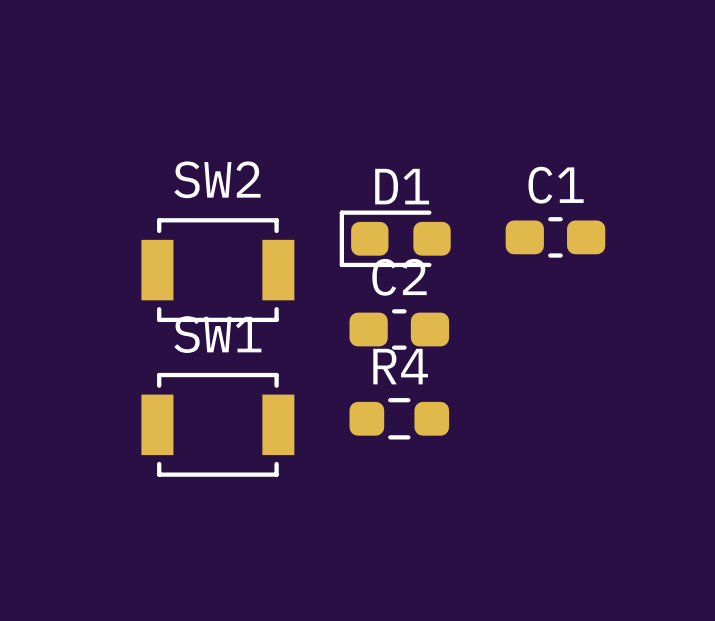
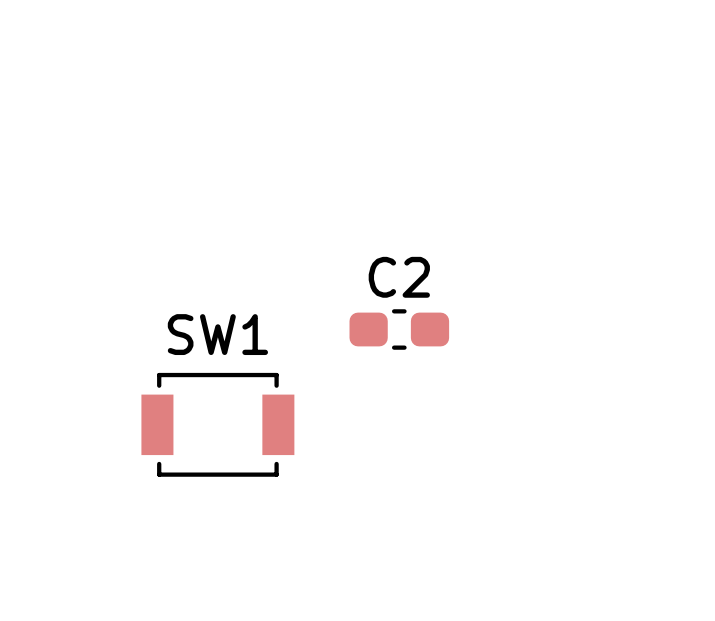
C1: (555, 237) -> none
D1: (395, 238) -> none
SW2: (217, 270) -> none
R4: (399, 418) -> none

